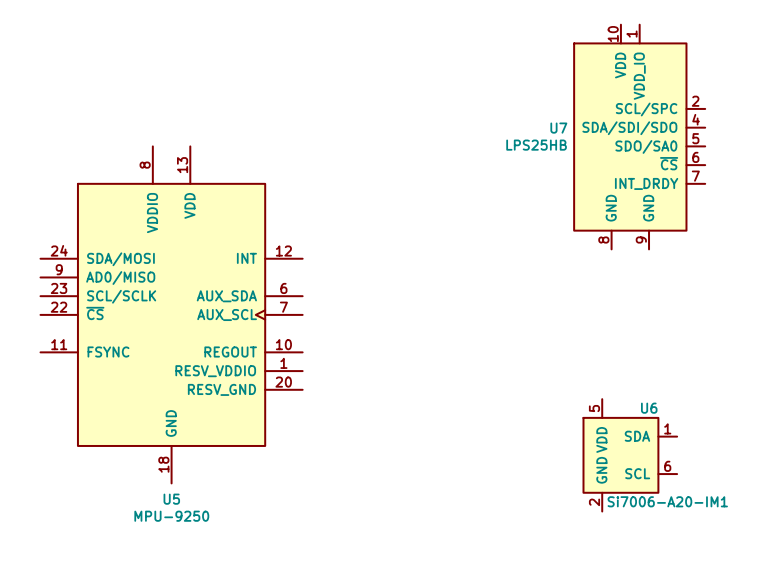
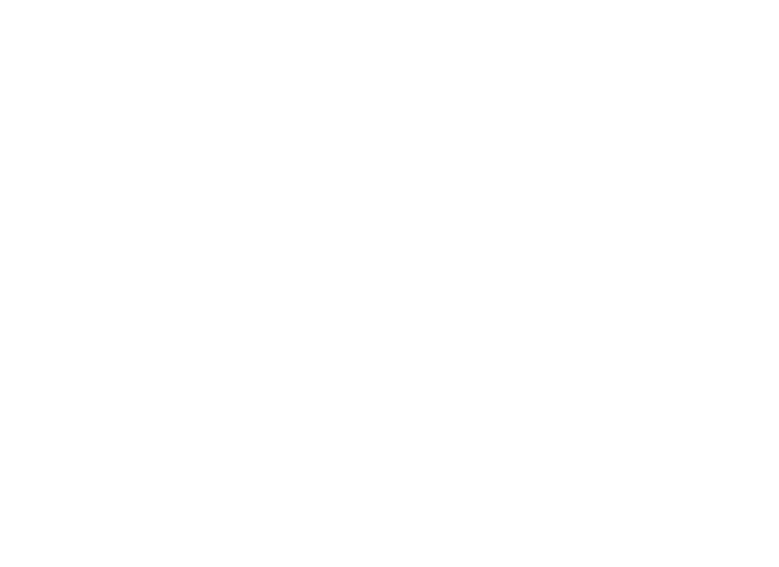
U7: LPS25HB (639, 137) -> none
U5: MPU-9250 (171, 314) -> none
U6: Si7006-A20-IM1 (630, 455) -> none

